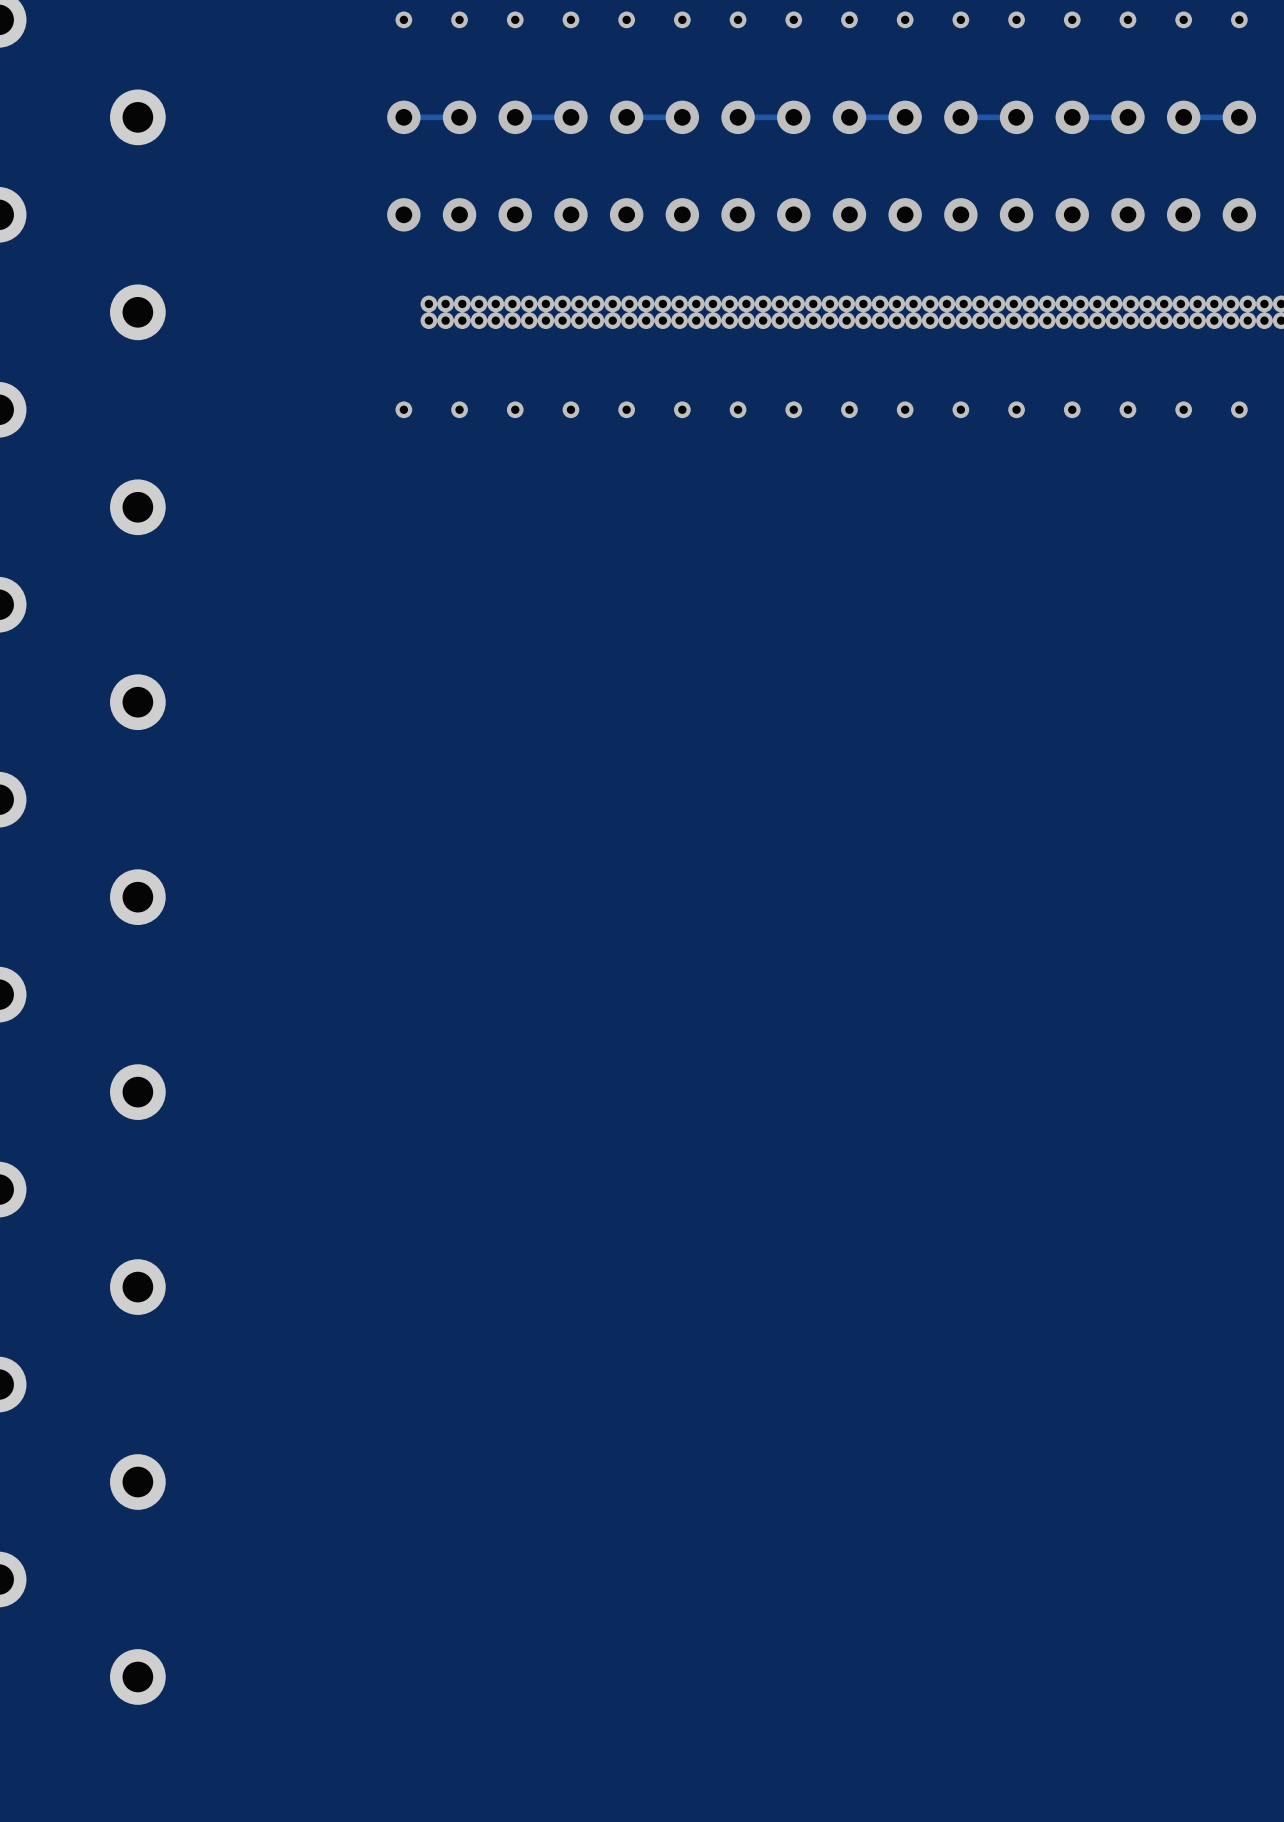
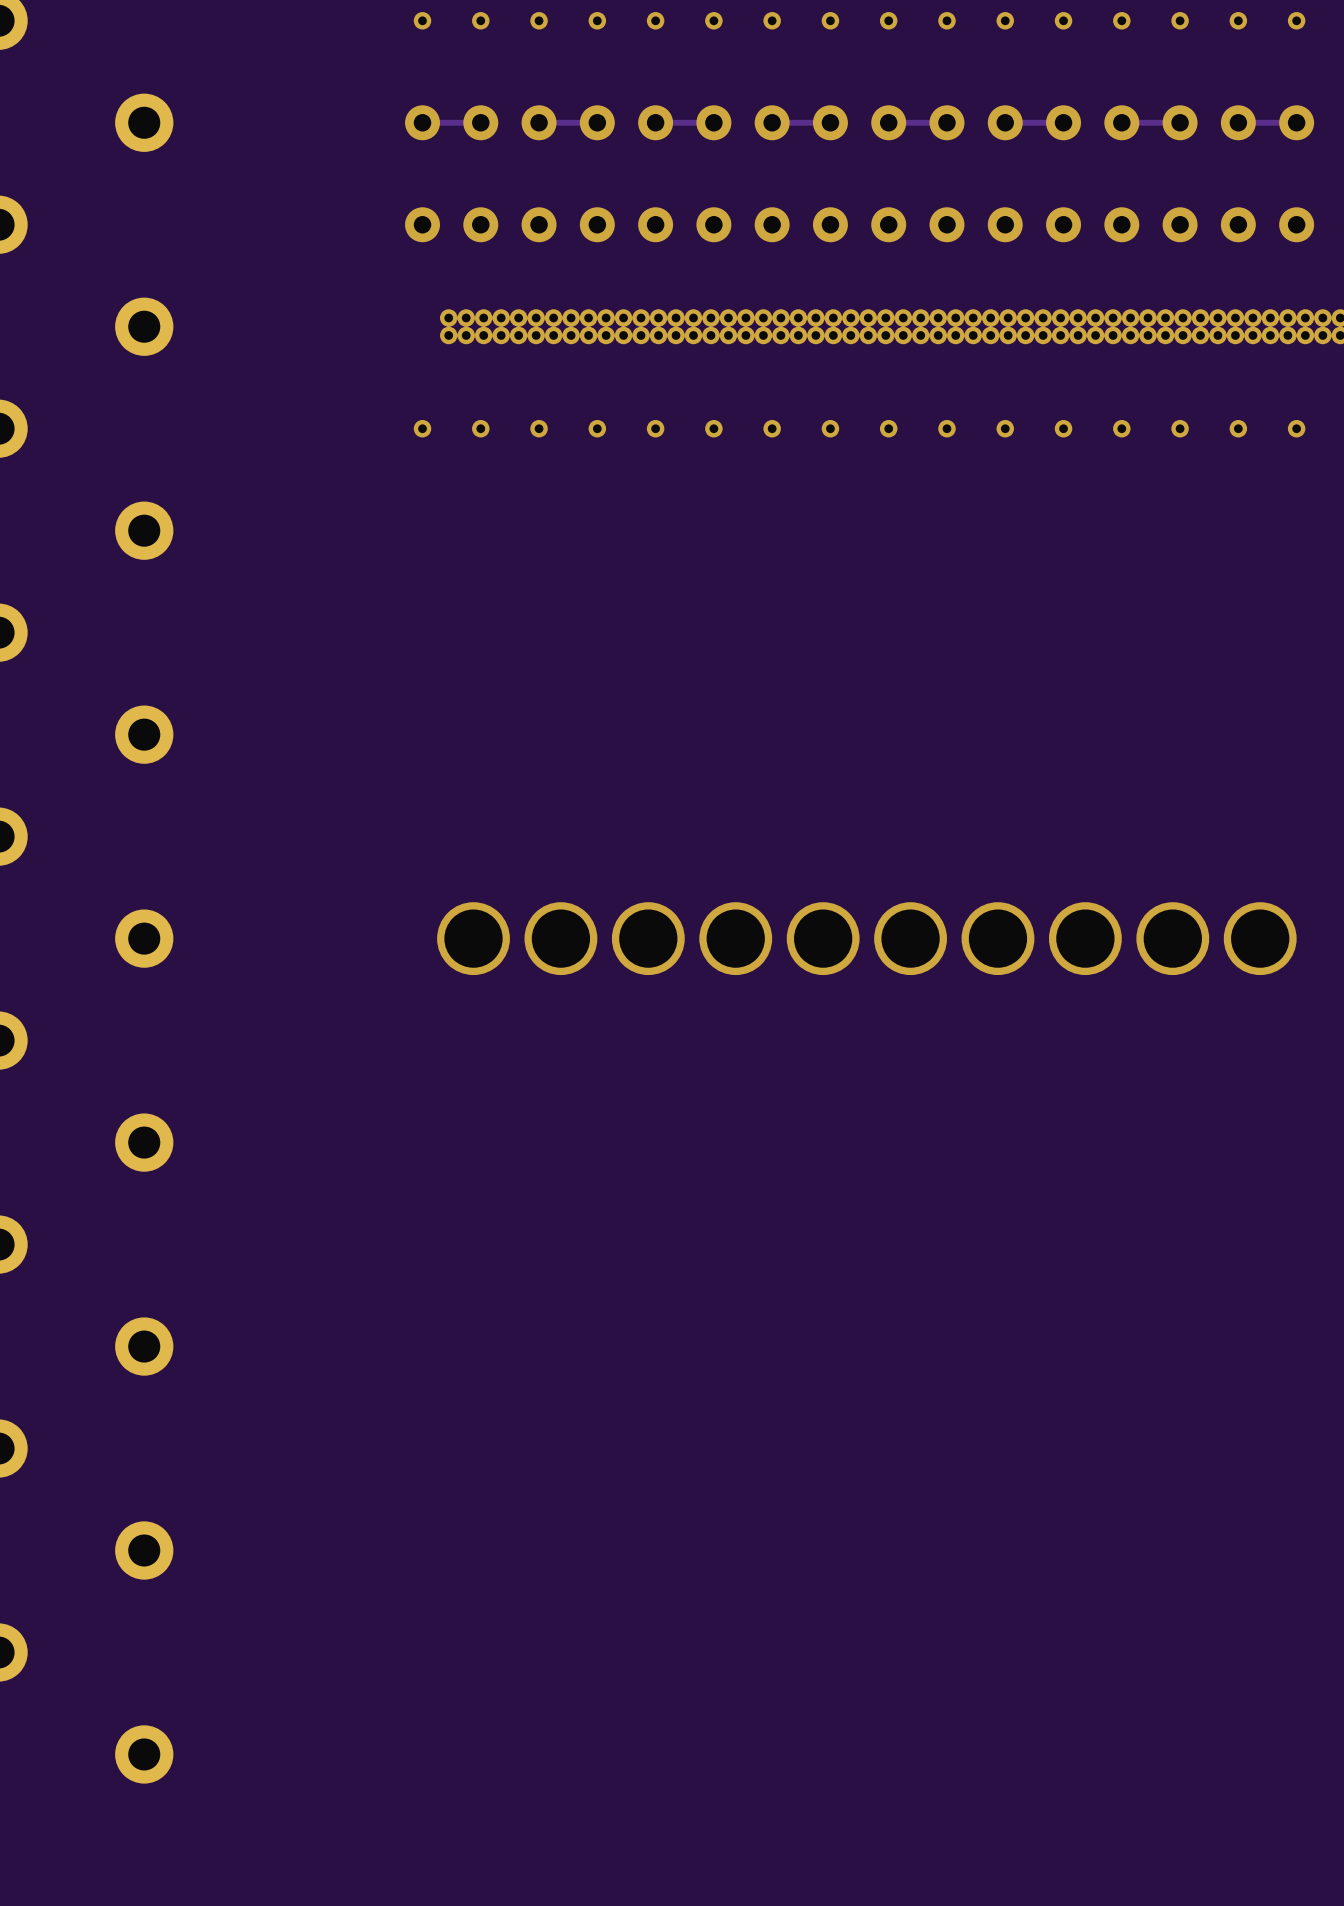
via: none -> (473, 938)
via: none -> (560, 938)
via: none -> (648, 938)
via: none -> (735, 938)
via: none -> (823, 938)
via: none -> (910, 938)
via: none -> (997, 938)
via: none -> (1085, 938)
via: none -> (1172, 938)
via: none -> (1260, 938)

